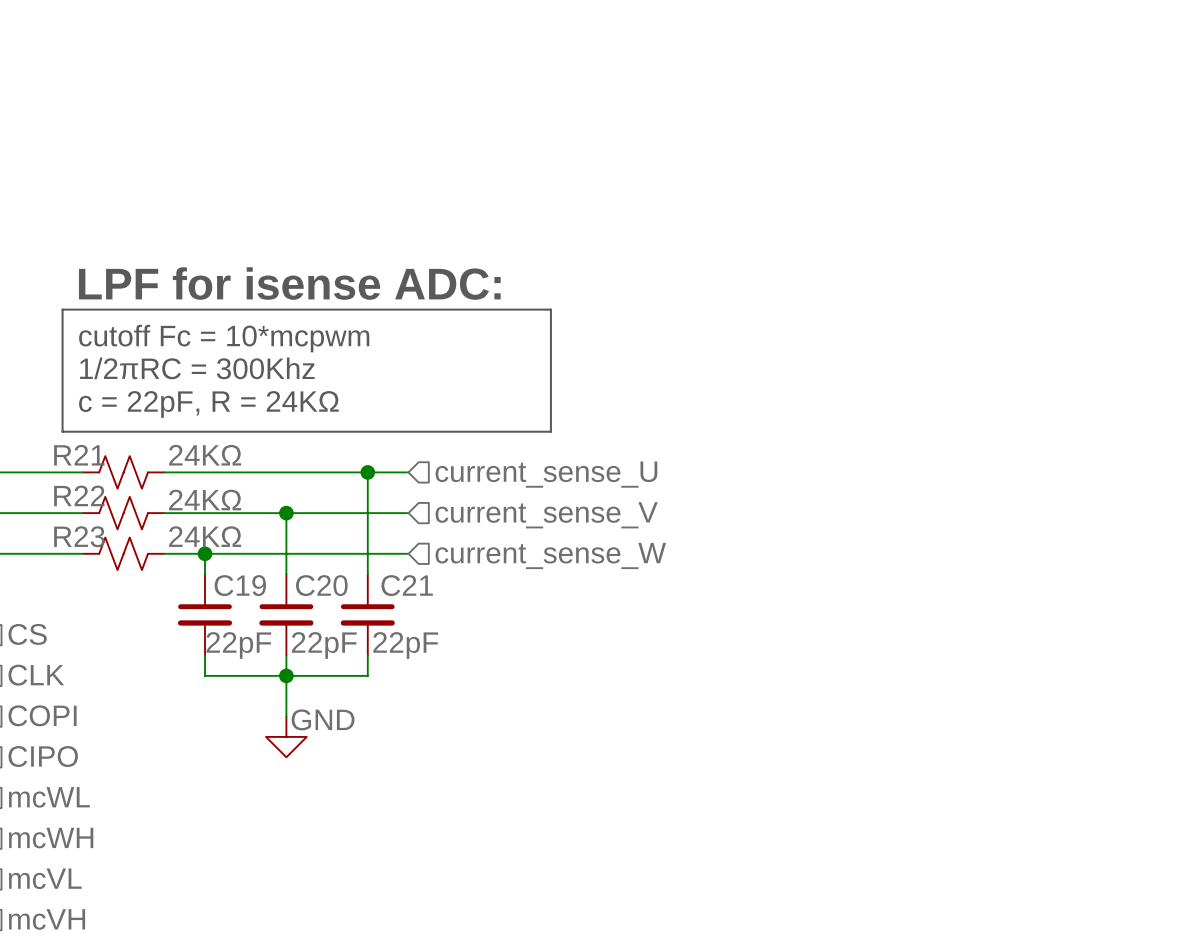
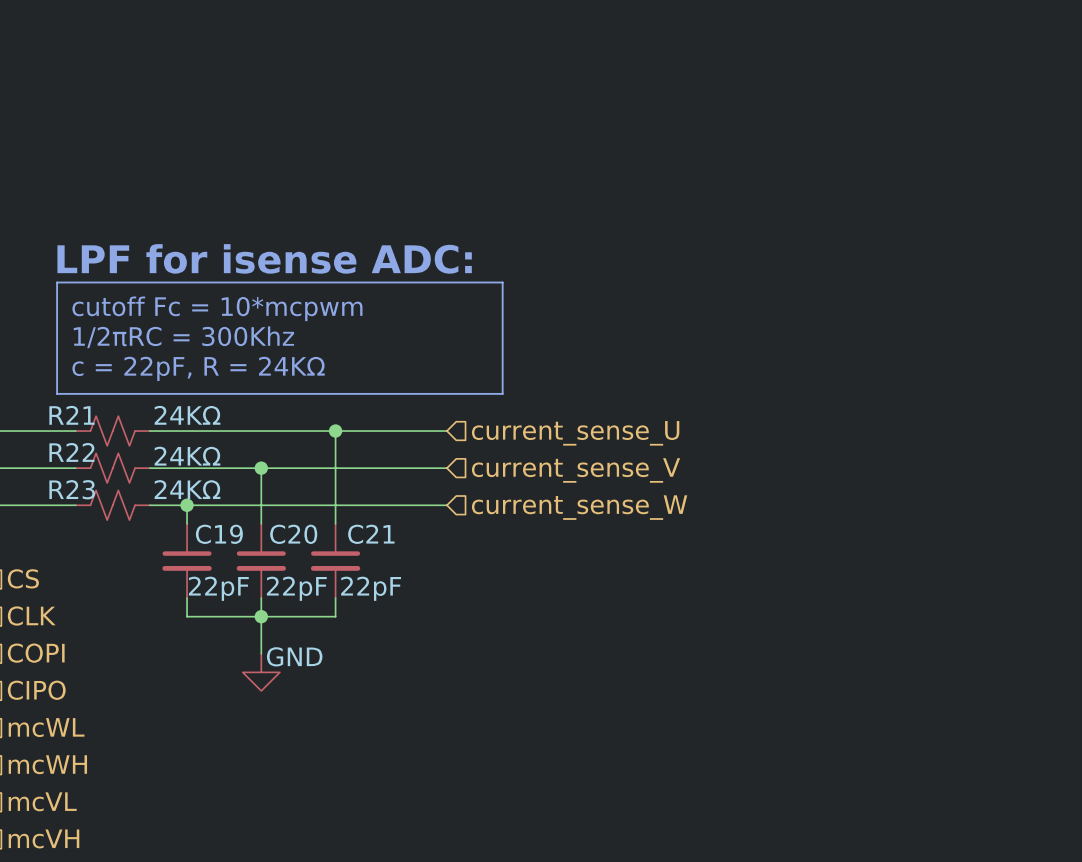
wire: none -> (372, 431) (446, 431)
hierarchical label position: current_sense_U (546, 474) -> current_sense_U (575, 433)
wire: none -> (372, 468) (446, 468)
hierarchical label position: current_sense_V (546, 515) -> current_sense_V (576, 470)
wire: none -> (372, 505) (446, 505)
hierarchical label position: current_sense_W (550, 555) -> current_sense_W (579, 507)

